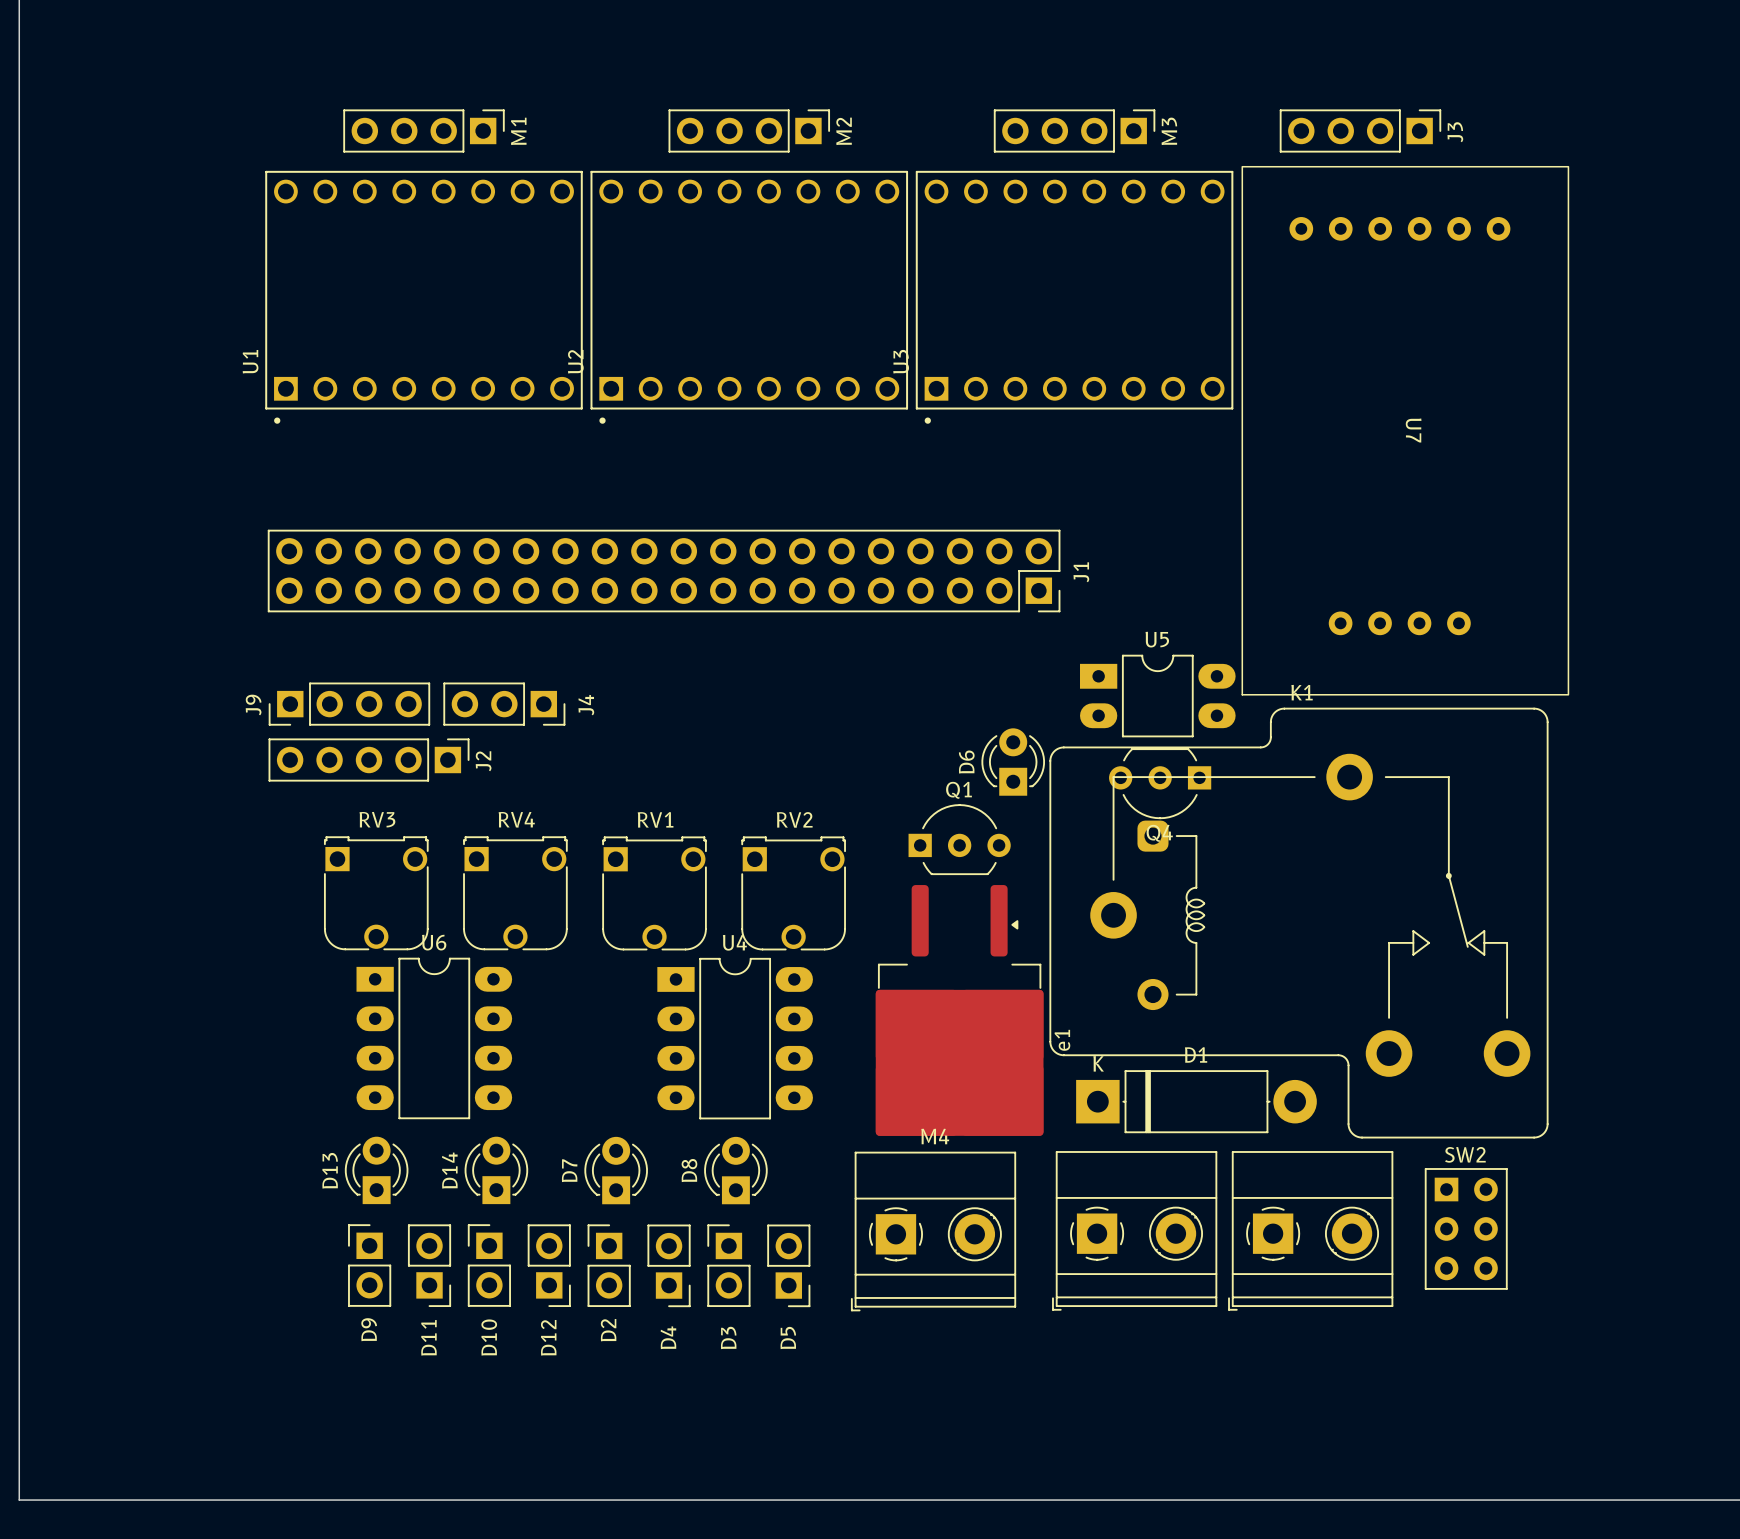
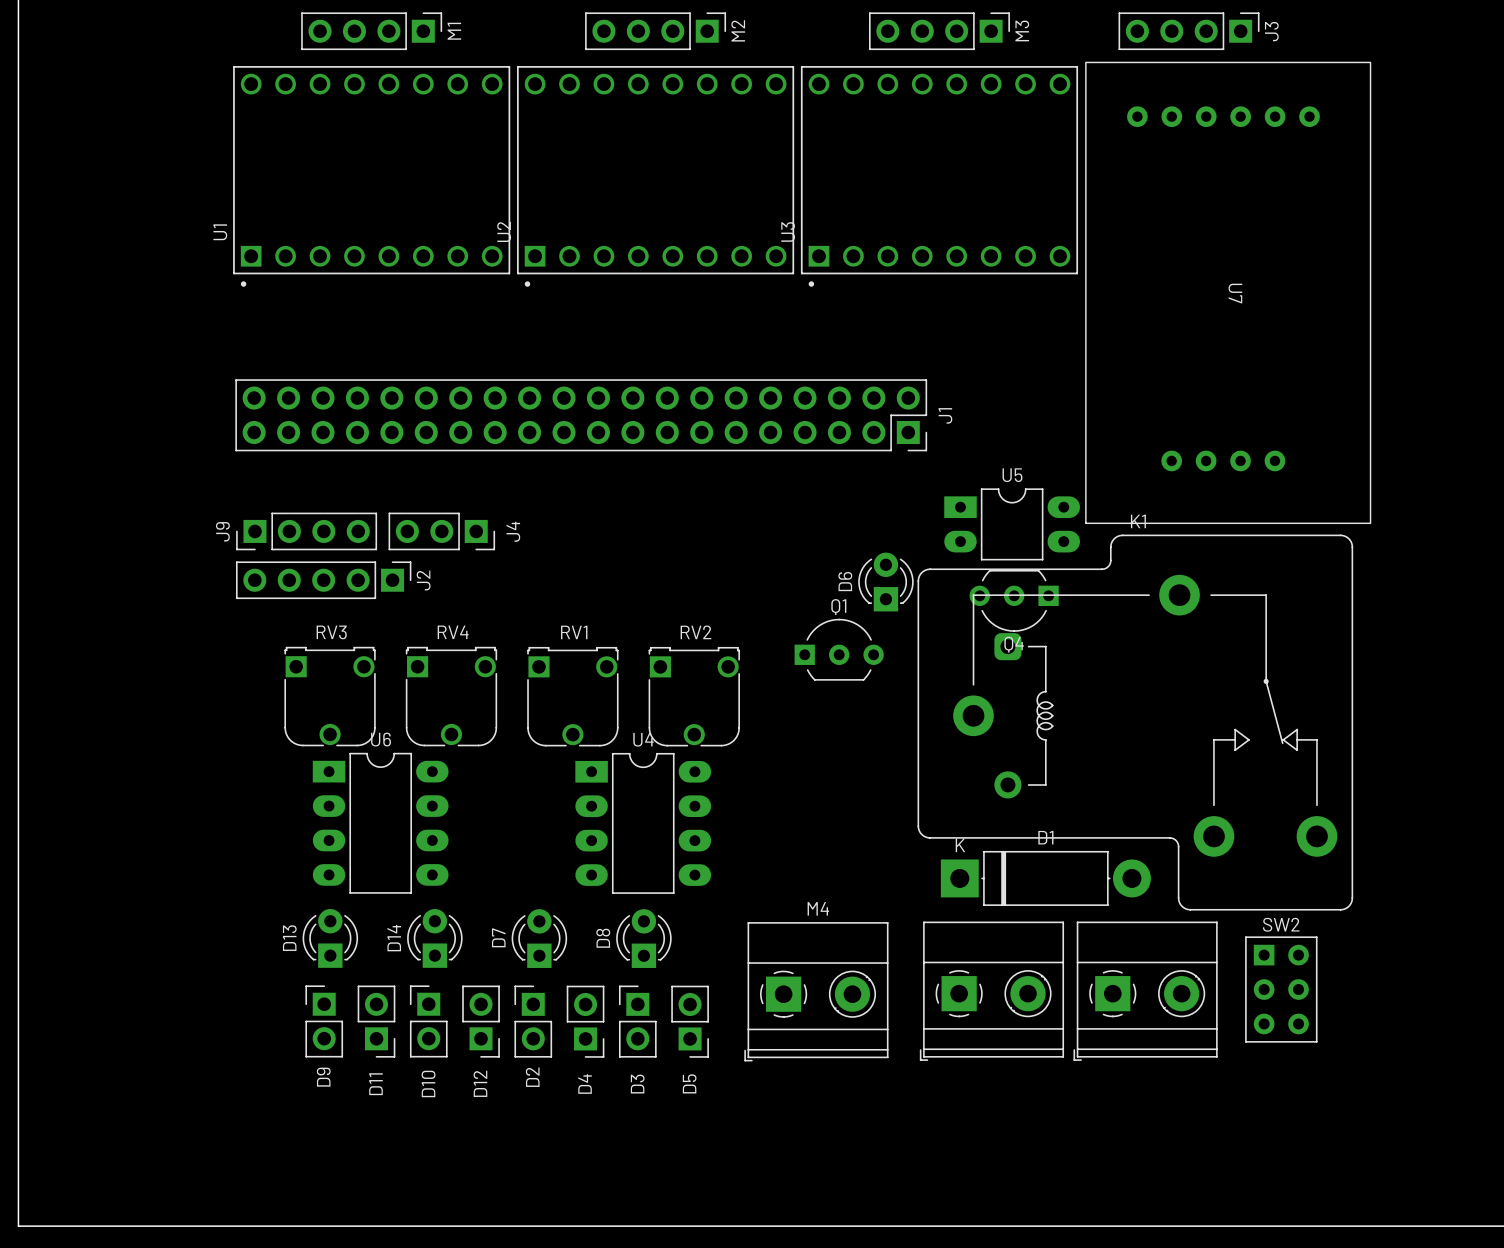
e1: (959, 1010) -> none

